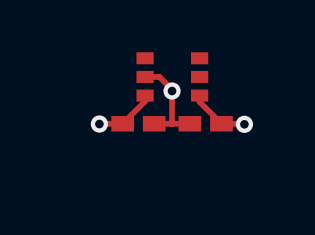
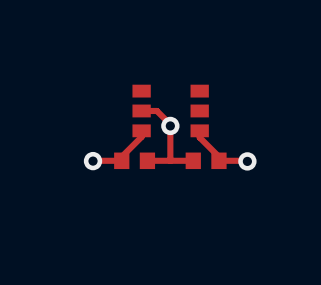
part footprint: [111, 115, 166, 132] -> [114, 152, 156, 170]
part footprint: [178, 115, 233, 132] -> [185, 152, 227, 170]

